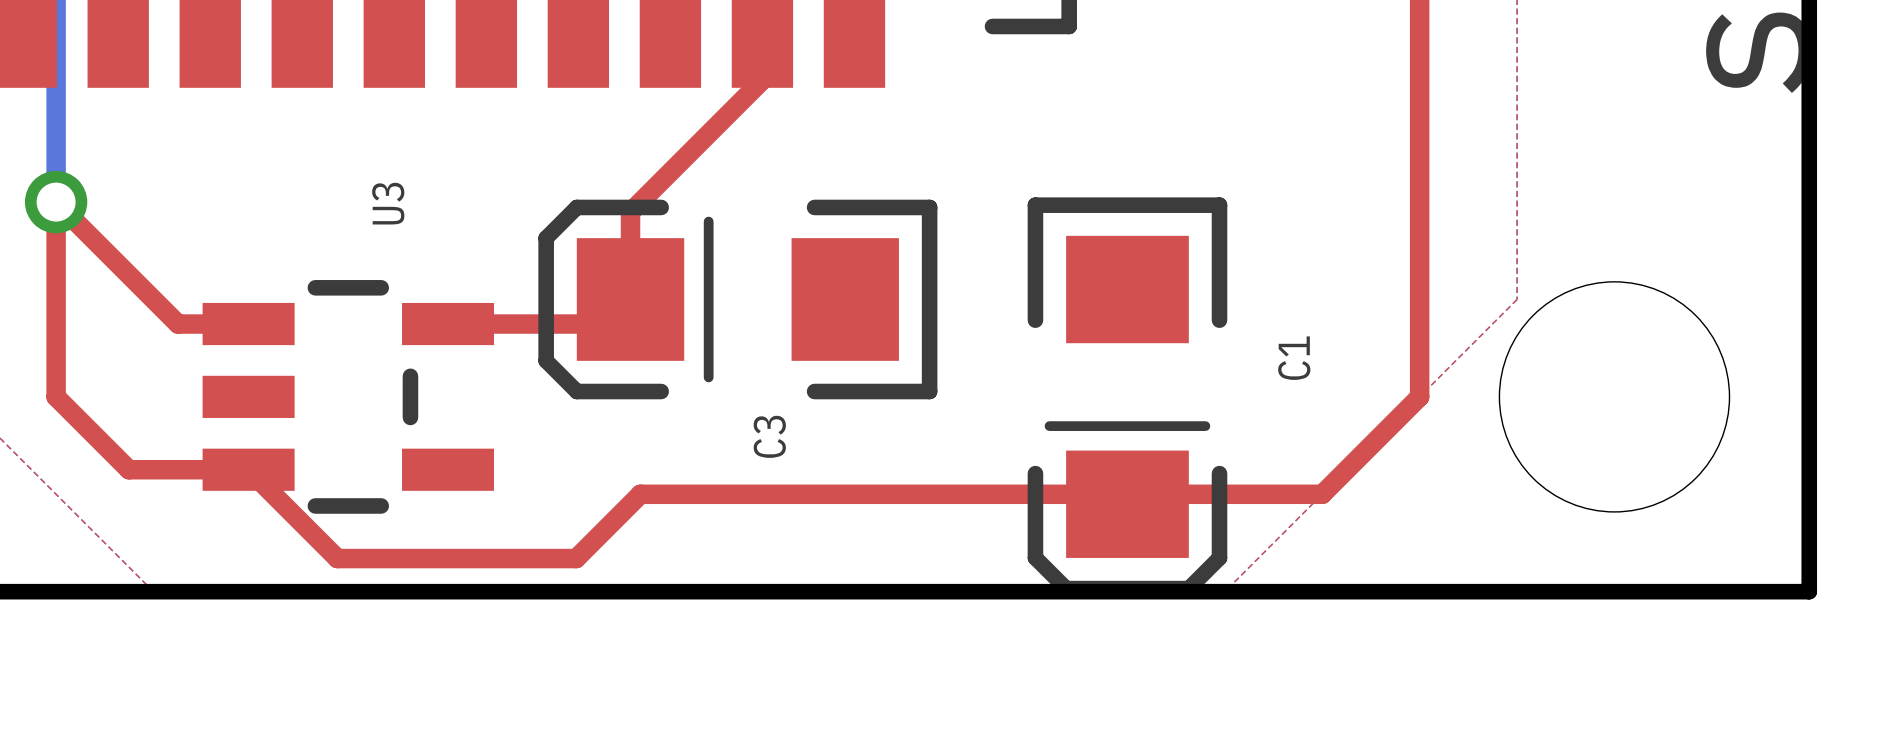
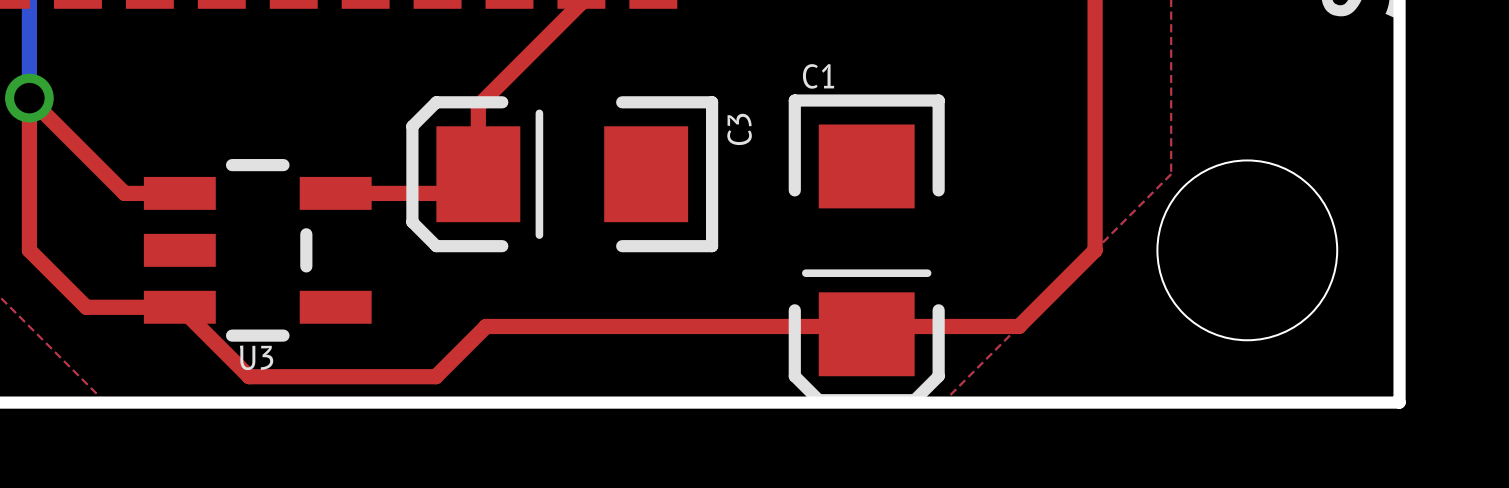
U3 name rotation: 0° (388, 203) -> 90° clockwise (256, 357)
U3 name position: U3 (388, 203) -> U3 (256, 357)
C1 name rotation: 0° (1294, 358) -> 90° clockwise (818, 76)
C1 name position: C1 (1294, 358) -> C1 (818, 76)
C3 name position: C3 (769, 436) -> C3 (739, 129)

